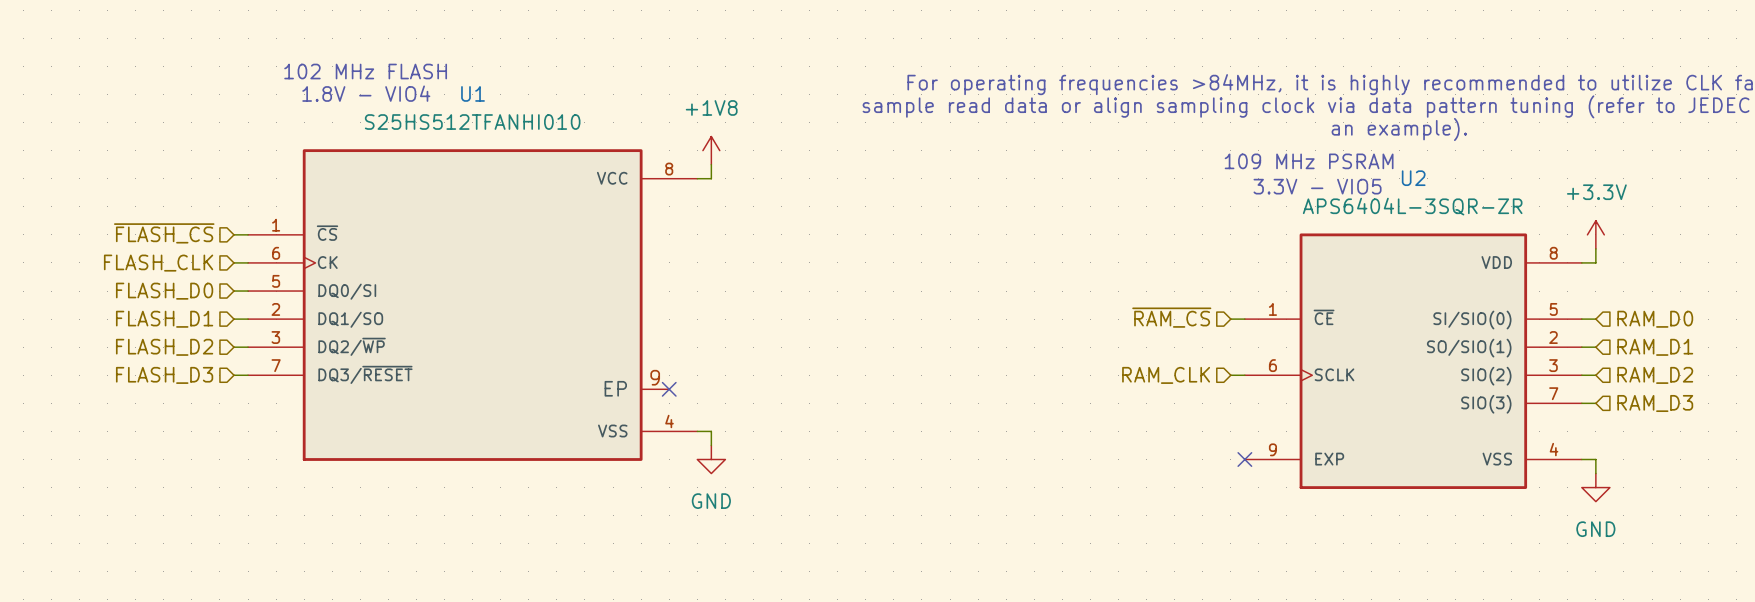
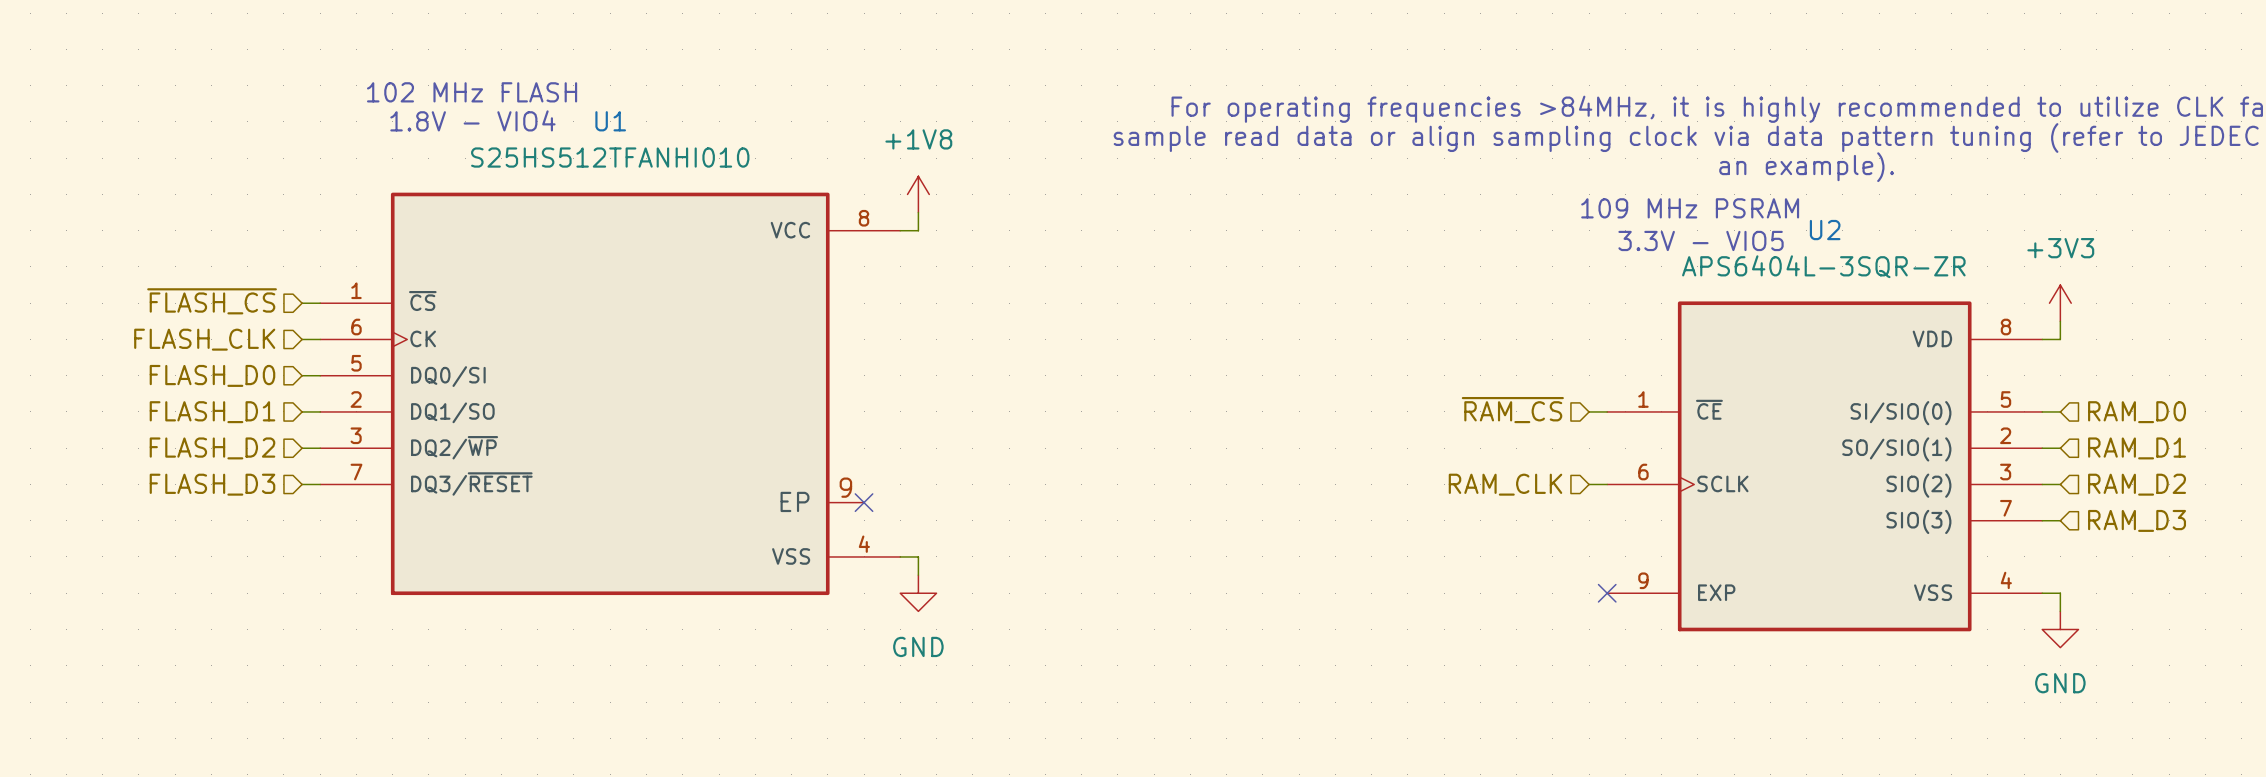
power symbol: +3.3V (1595, 234) -> +3V3 (2060, 303)

